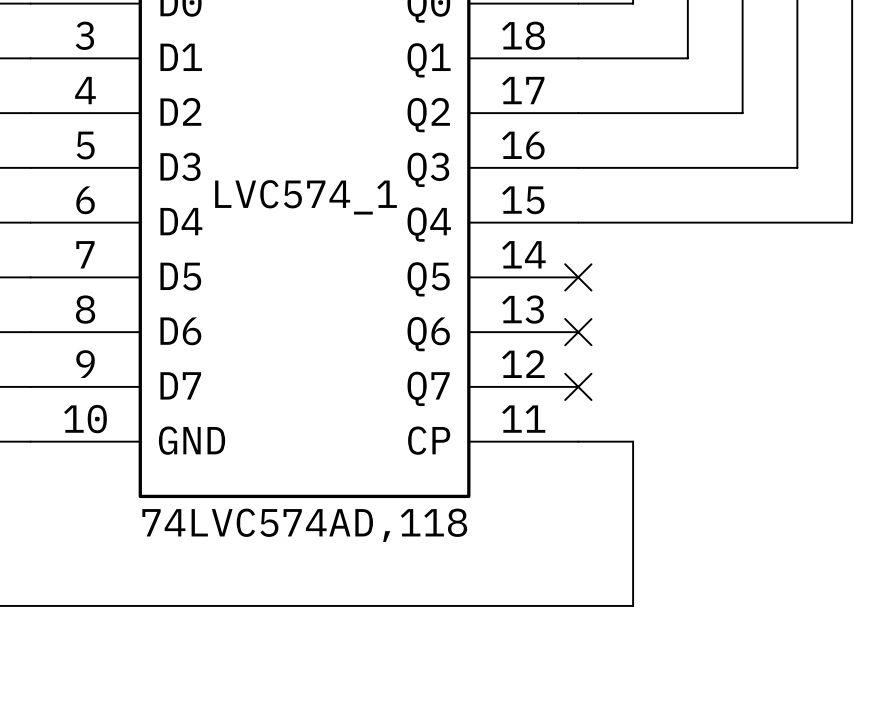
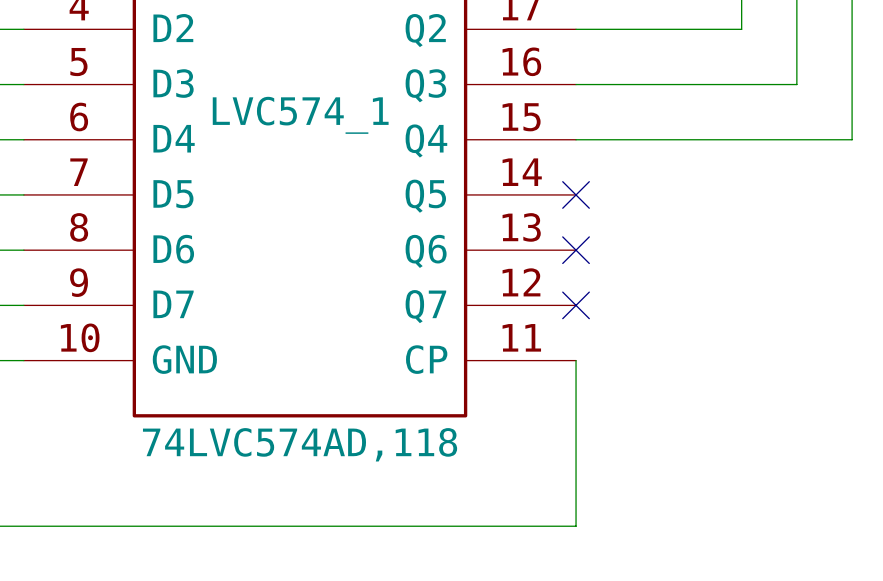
wire: (578, 441) (633, 441) (633, 605) (578, 605) -> (576, 360) (576, 526)

